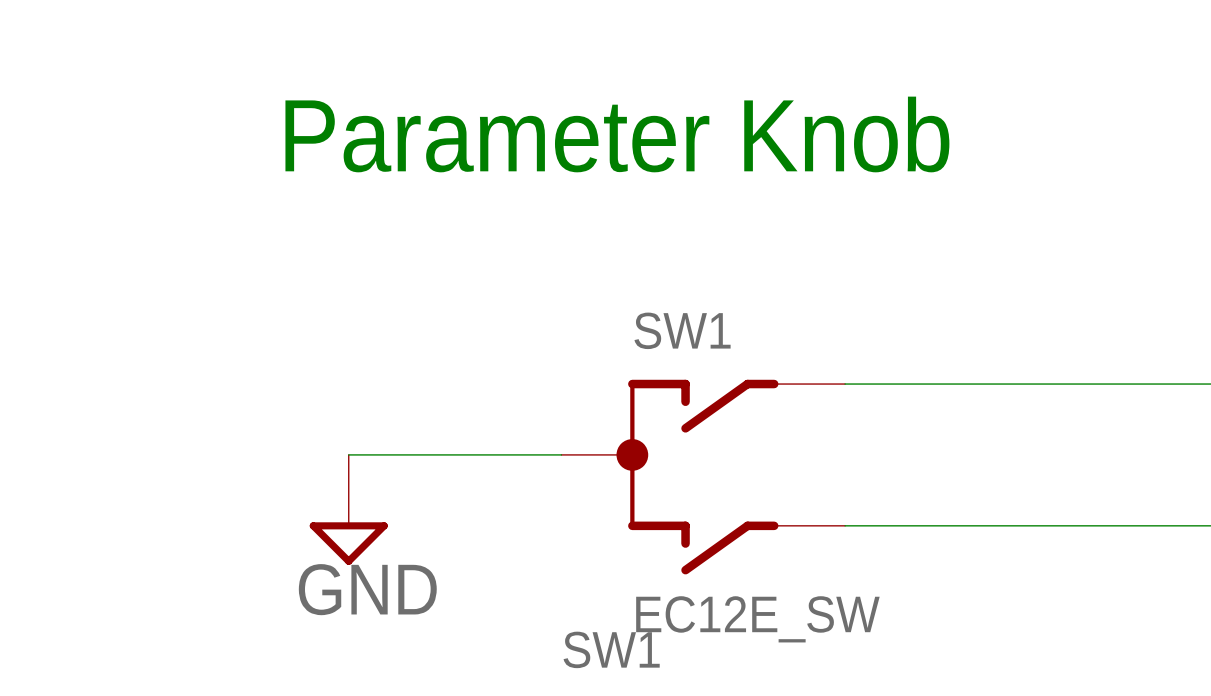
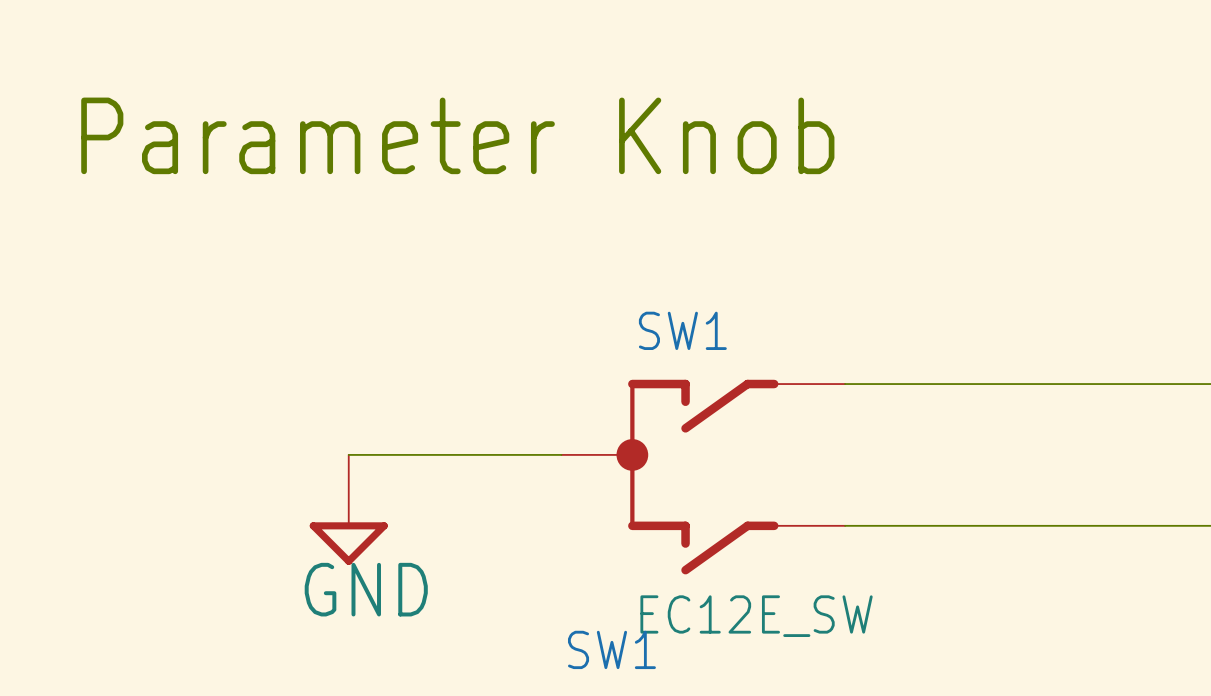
text position: Parameter Knob (617, 134) -> Parameter Knob (457, 135)

